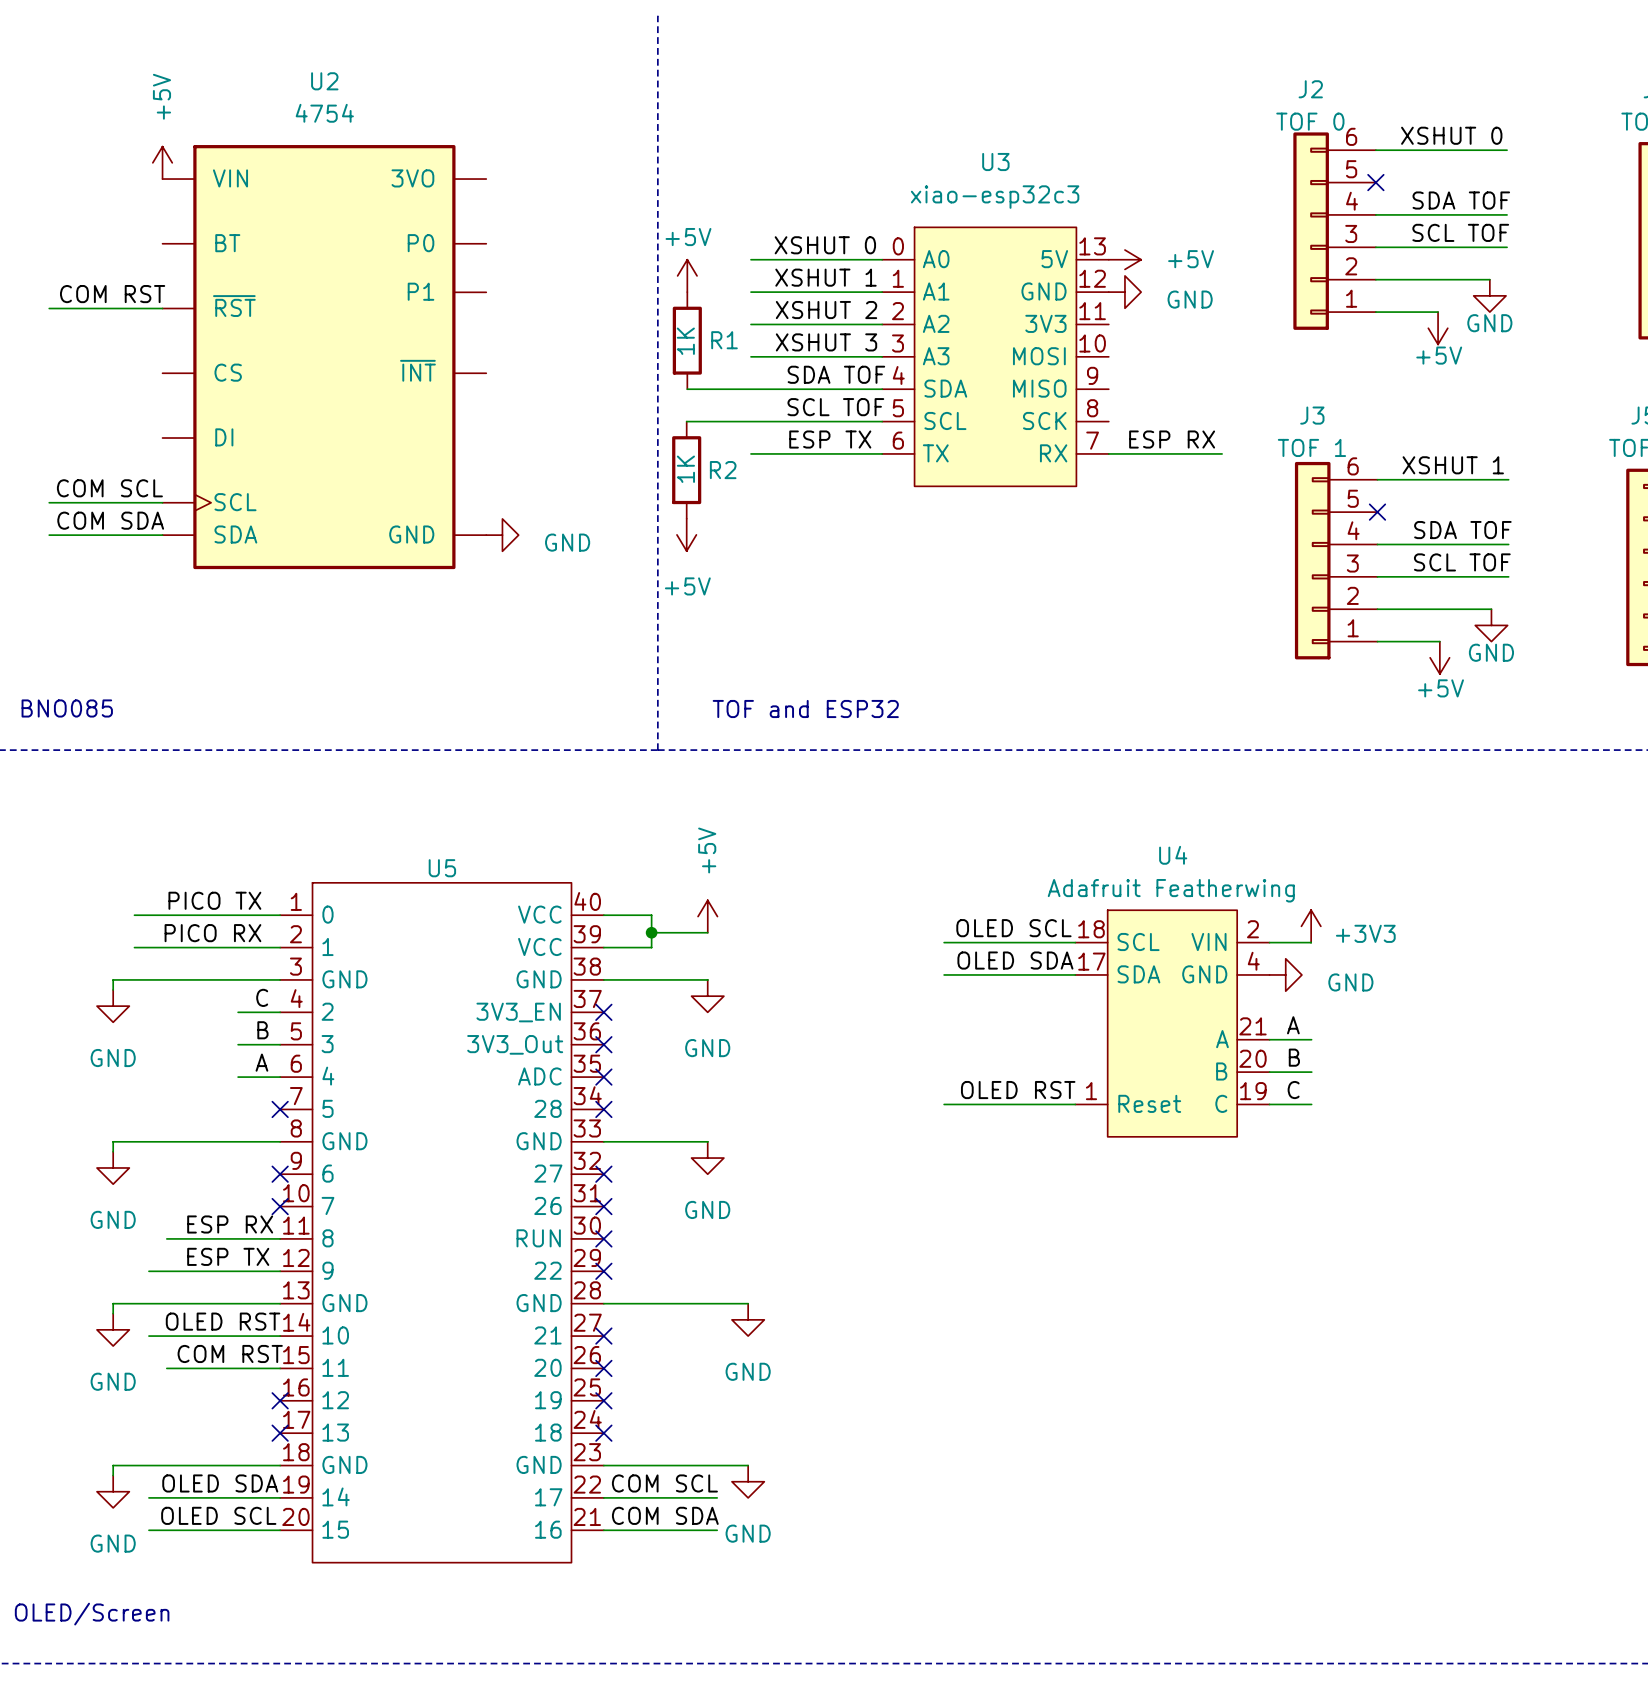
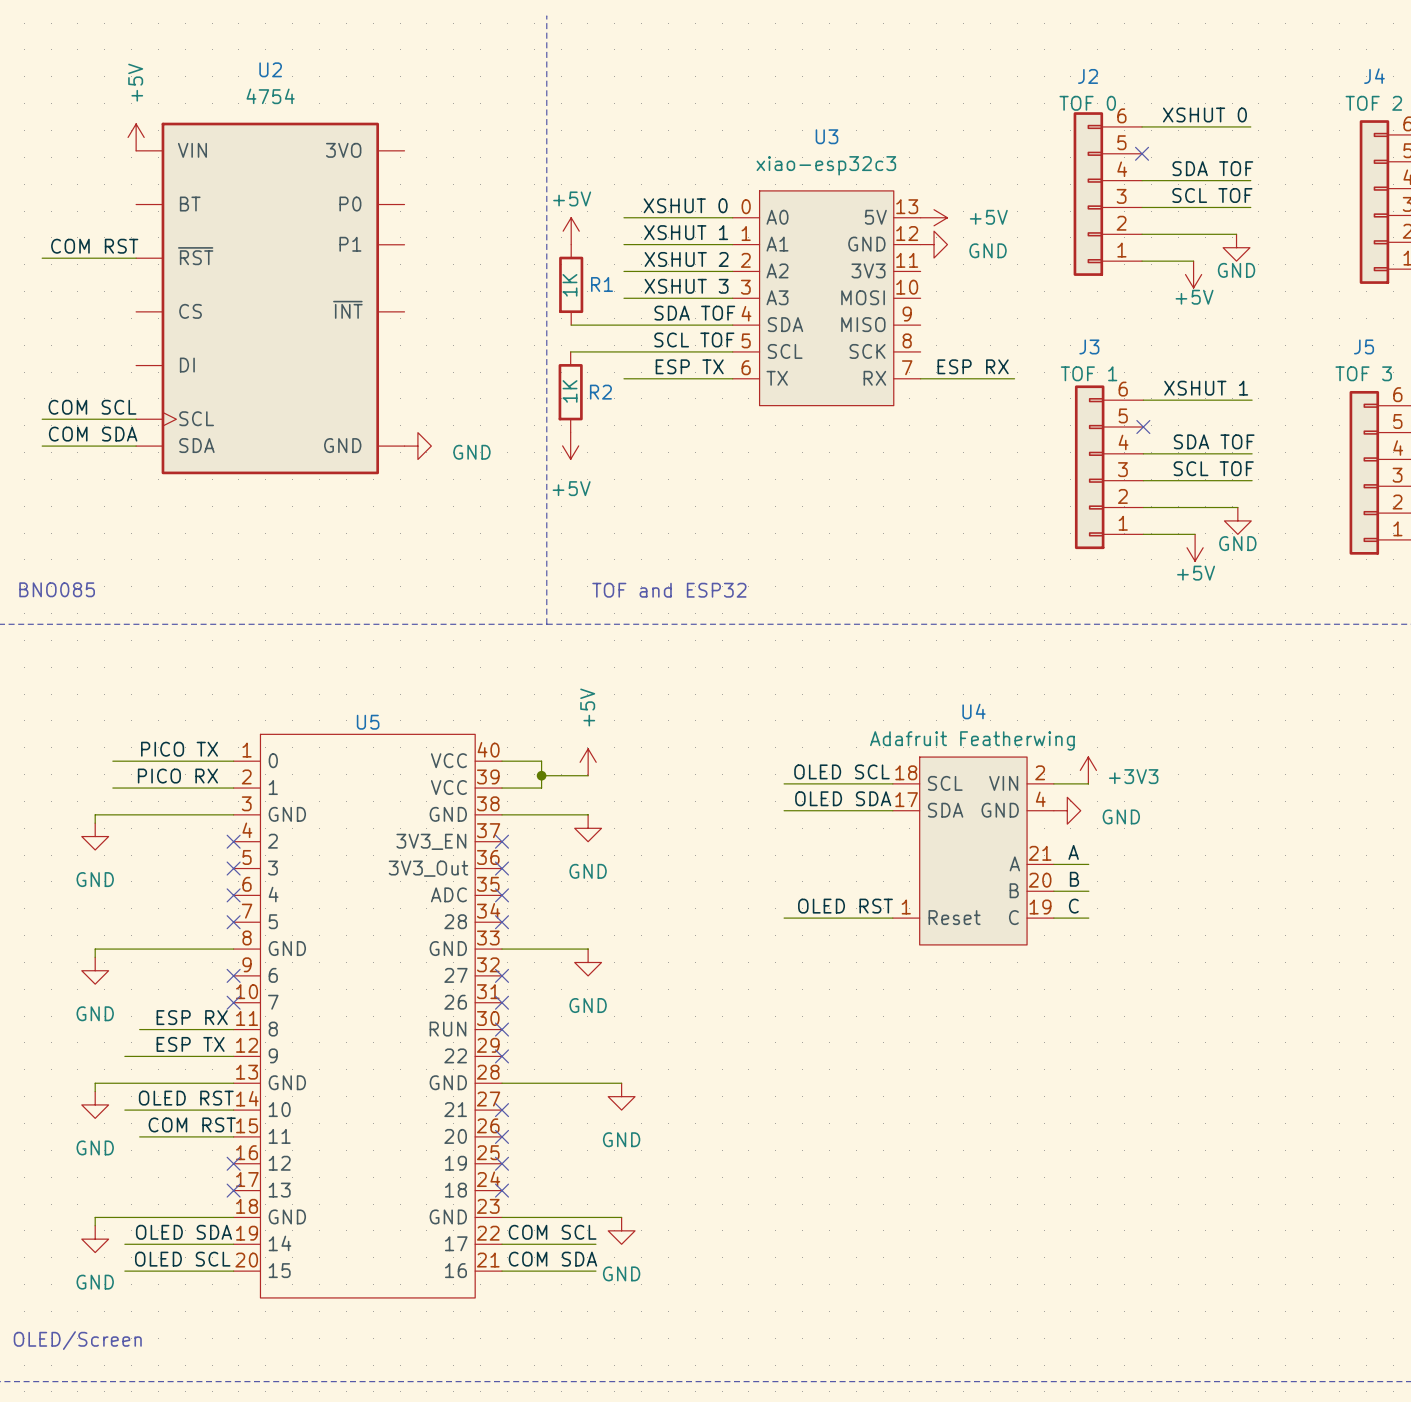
label: C (262, 997) -> none
wire: (238, 1012) (280, 1012) -> none
no-connect mark: none -> (233, 841)
label: B (262, 1030) -> none
wire: (238, 1044) (280, 1044) -> none
no-connect mark: none -> (233, 868)
label: A (261, 1062) -> none
wire: (238, 1077) (280, 1077) -> none
no-connect mark: none -> (233, 895)

